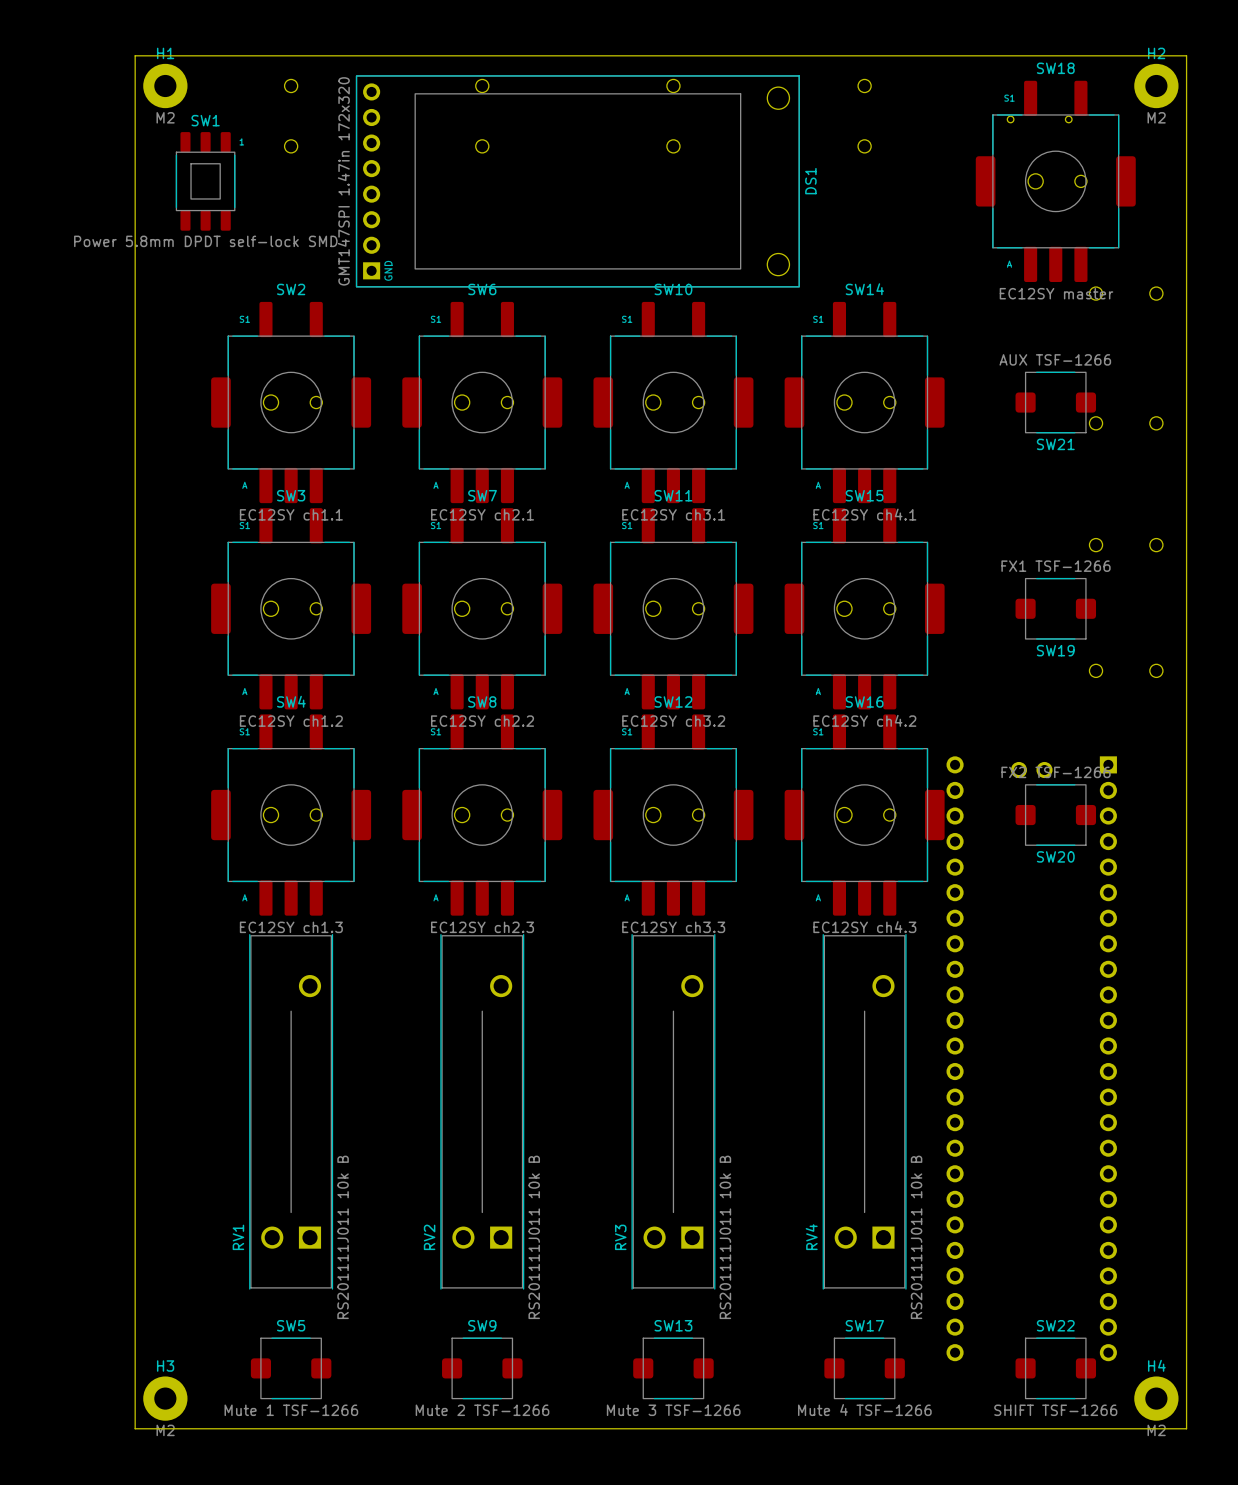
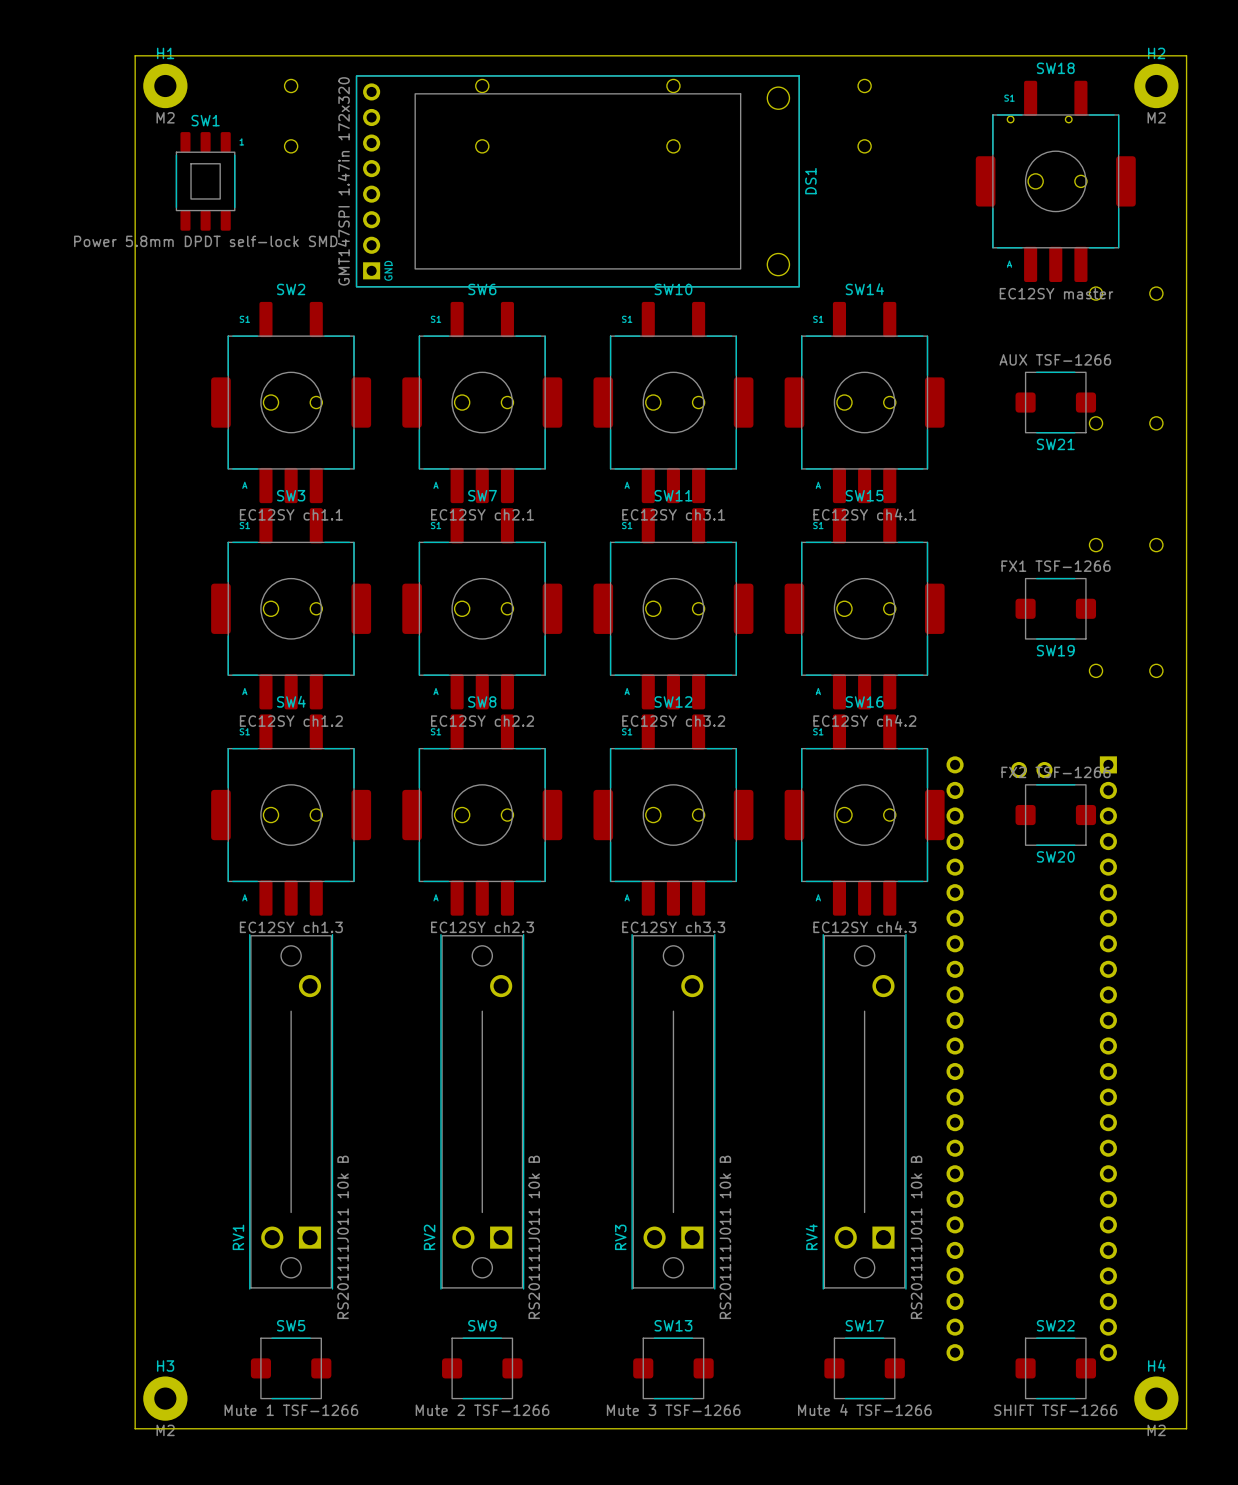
RV1 footprint: [249, 934, 334, 1290] -> [249, 934, 334, 1290]
RV2 footprint: [440, 934, 525, 1290] -> [440, 934, 525, 1290]
RV3 footprint: [631, 934, 716, 1290] -> [631, 934, 716, 1290]
RV4 footprint: [822, 934, 907, 1290] -> [822, 934, 907, 1290]

